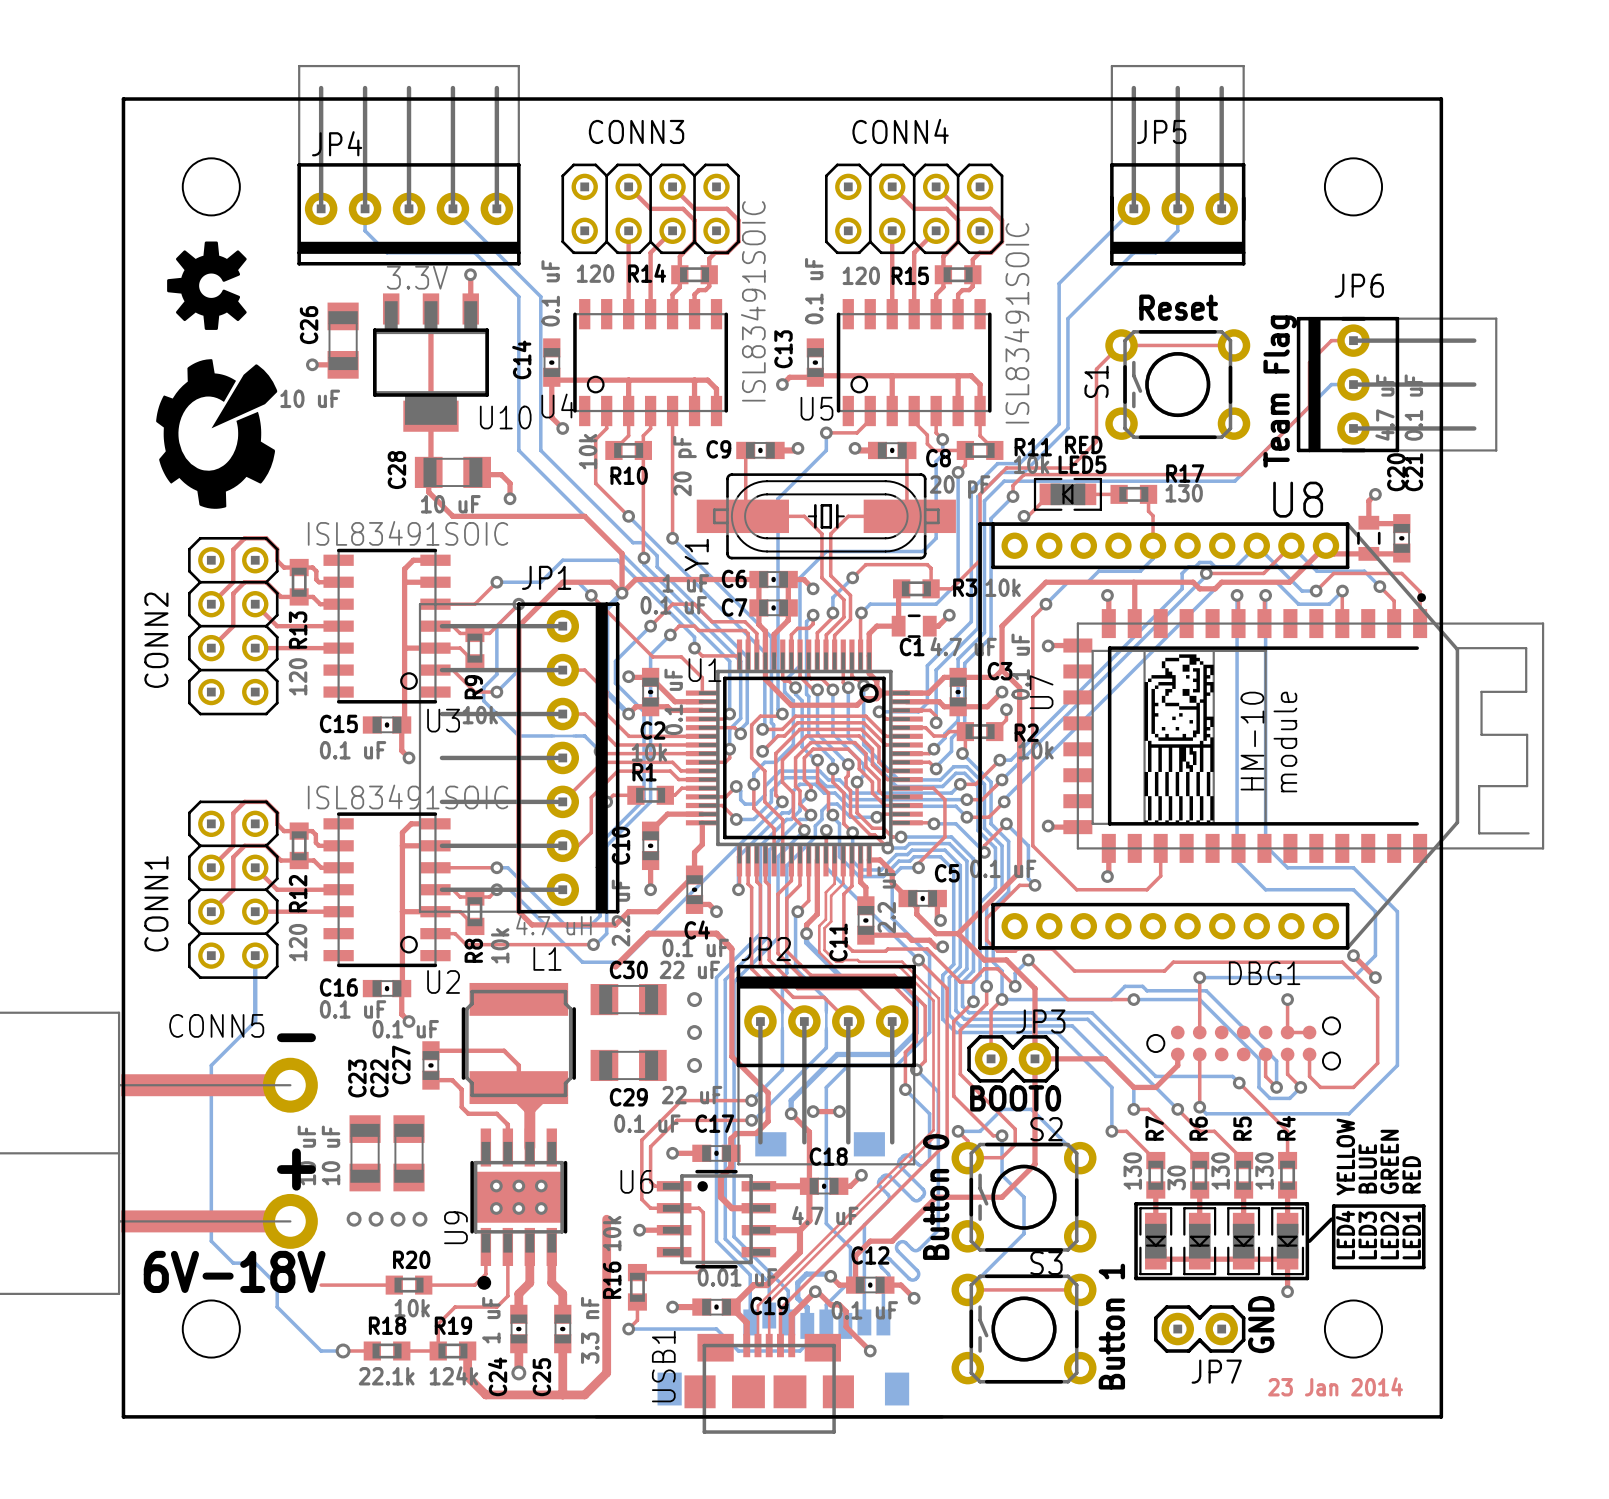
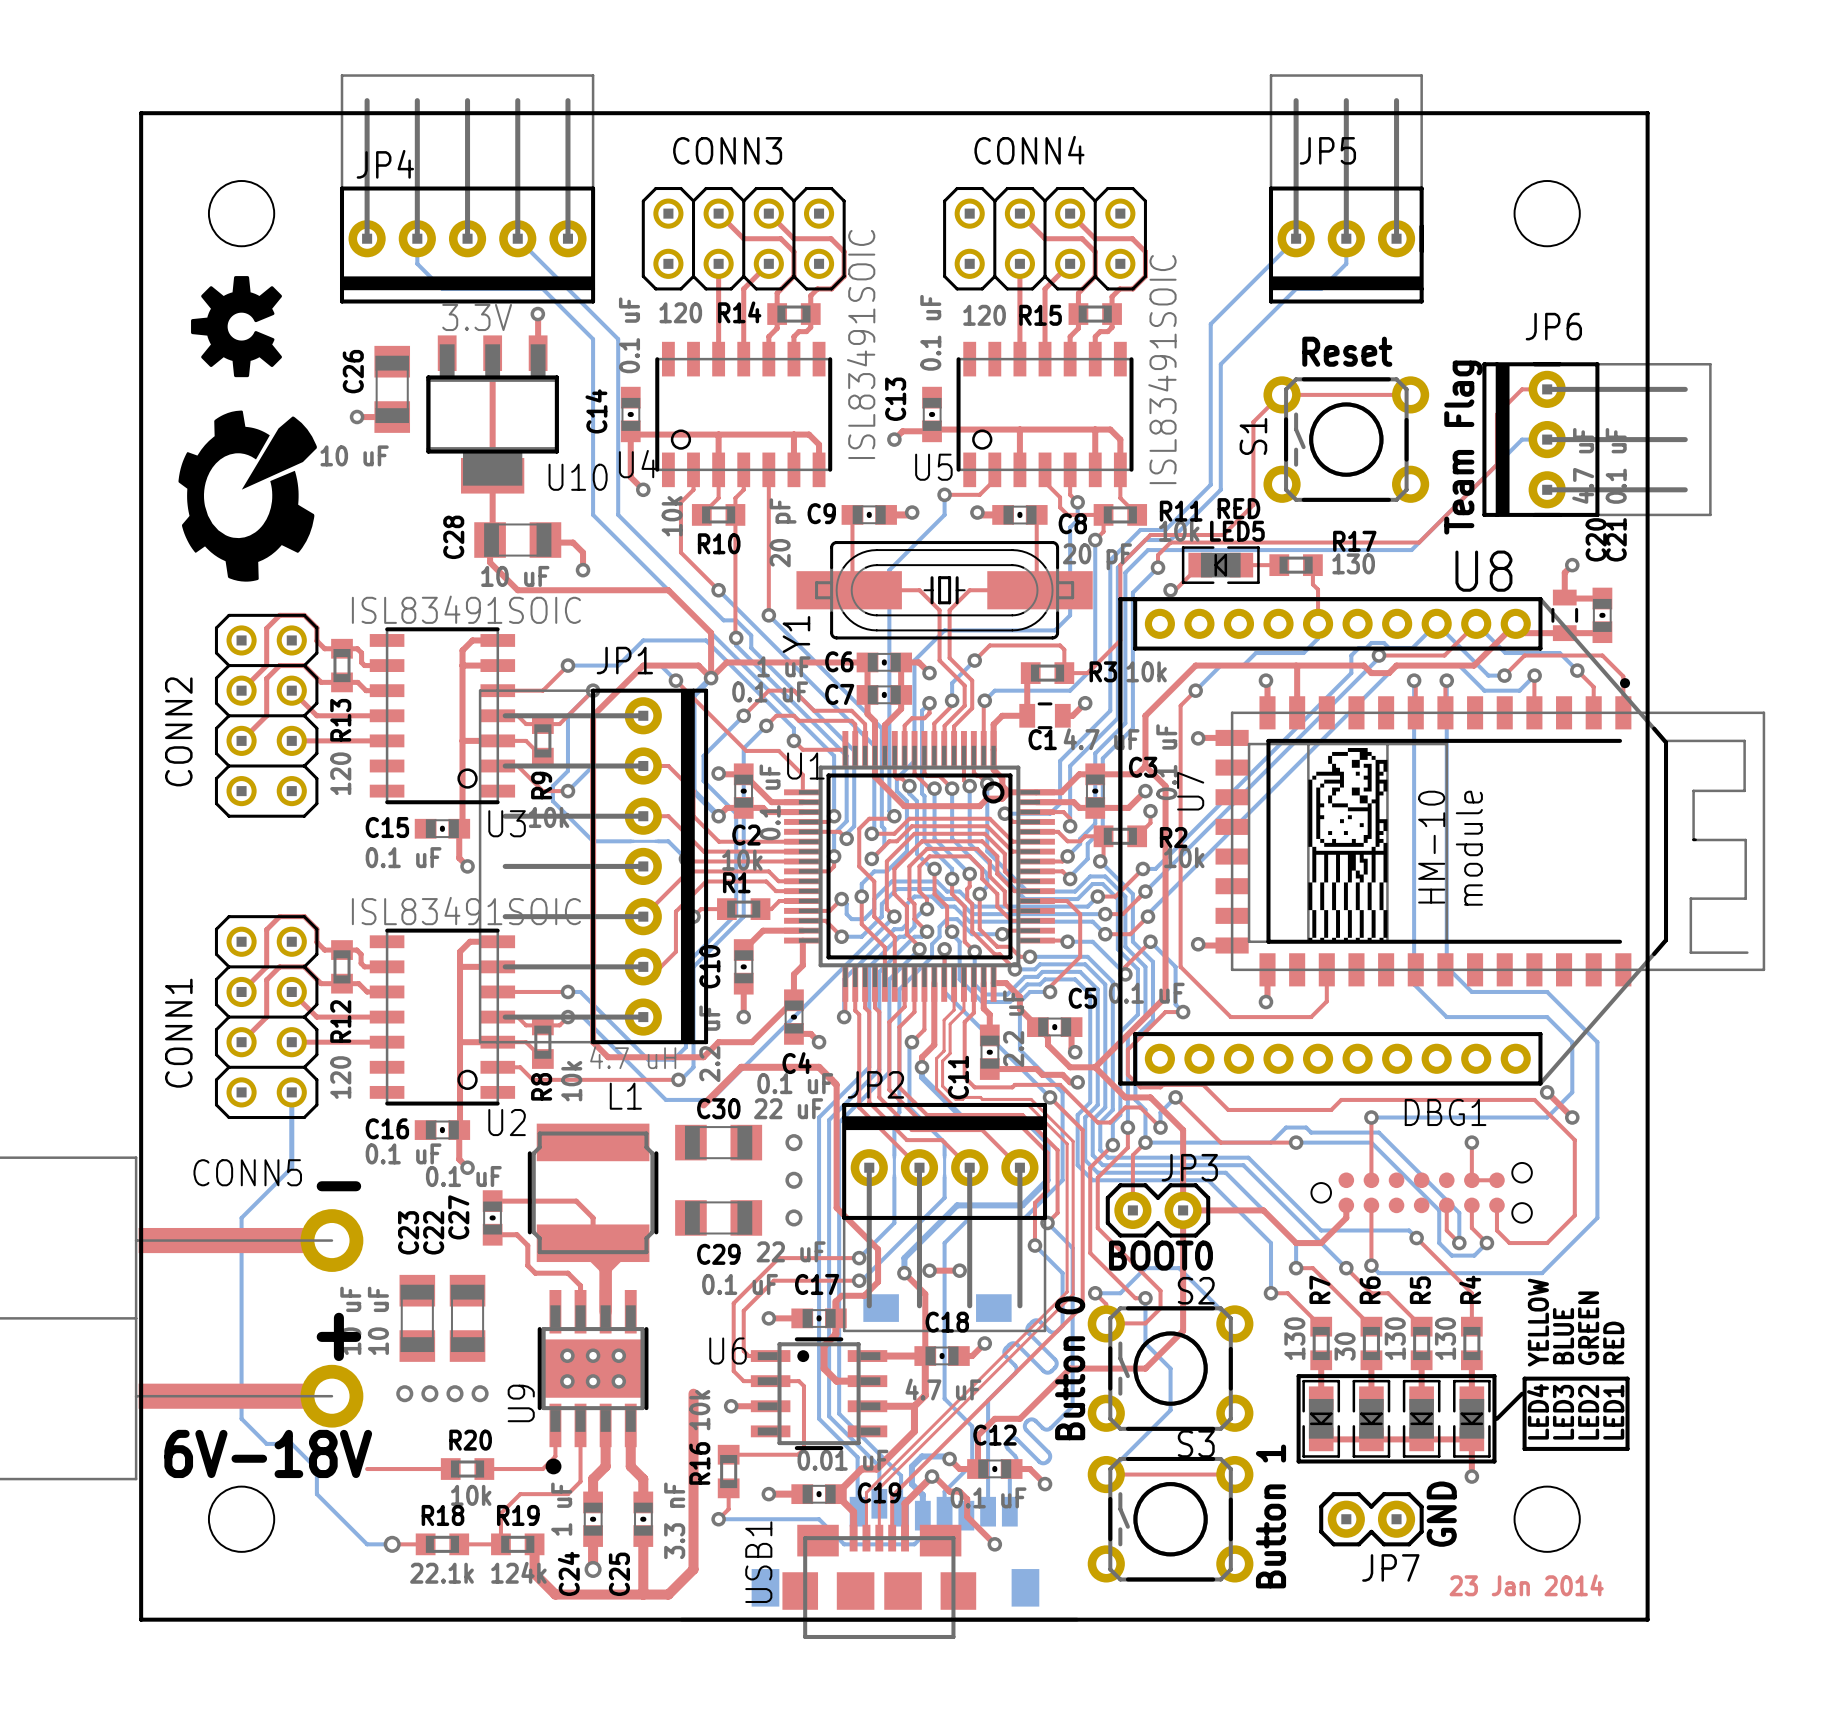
U8 footprint: [978, 522, 1460, 950] -> [1118, 597, 1669, 1086]
U7 footprint: [1063, 593, 1545, 863] -> [1215, 678, 1766, 987]

